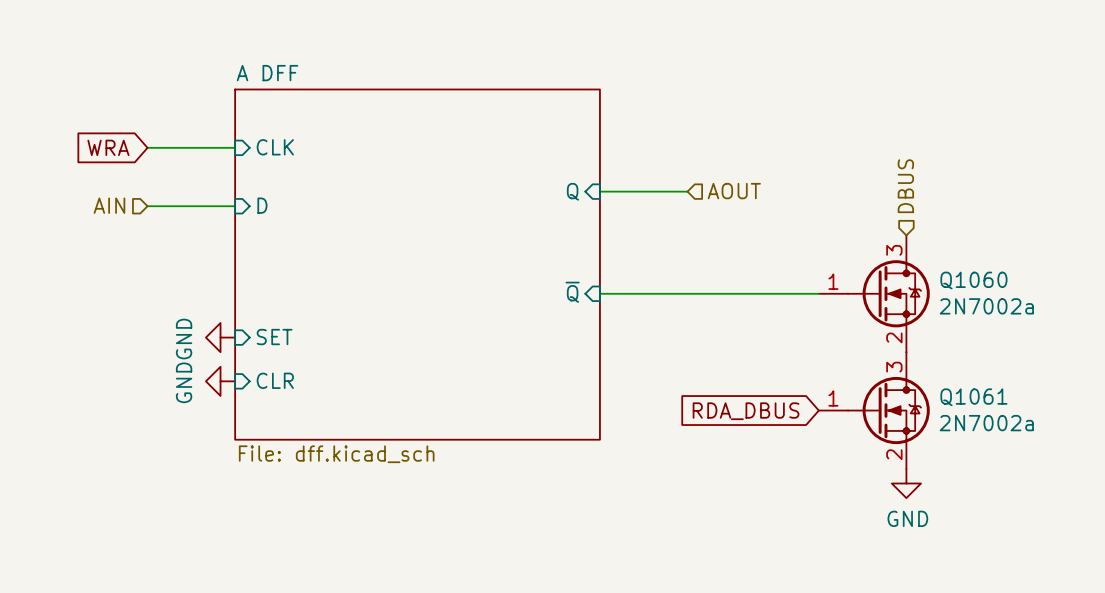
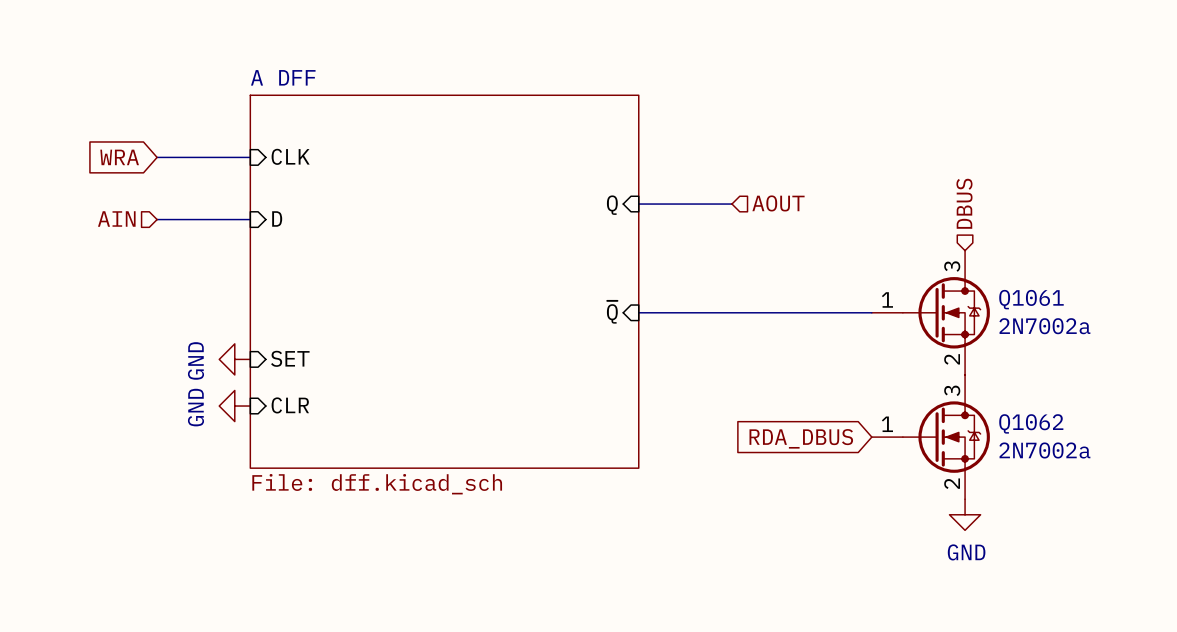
Q1060 name: Q1060 (973, 280) -> Q1061 (1031, 299)
Q1061 name: Q1061 (973, 397) -> Q1062 (1031, 423)

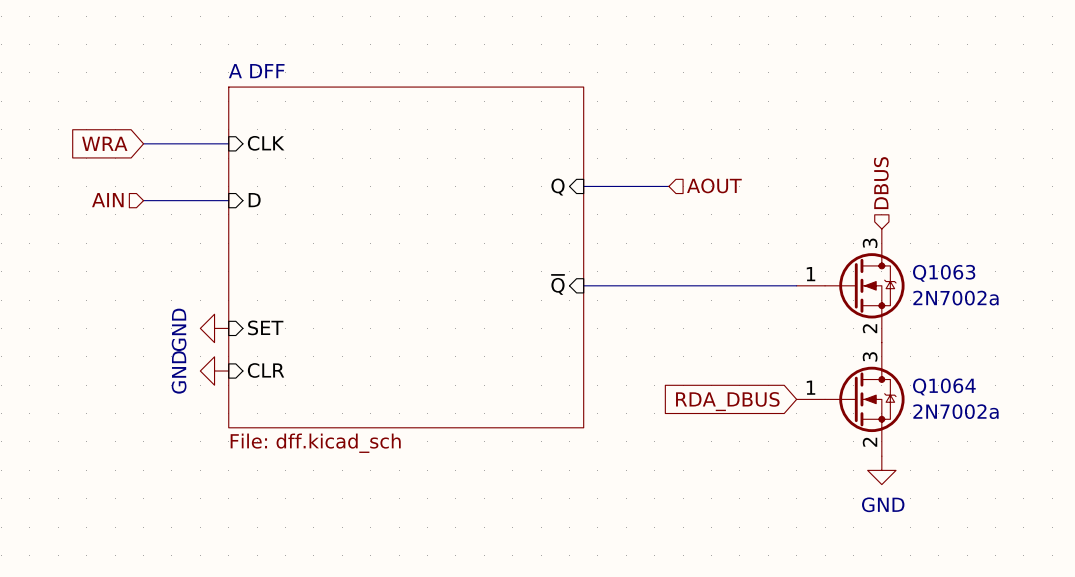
Q1061 name: Q1061 (1031, 299) -> Q1063 (944, 273)
Q1062 name: Q1062 (1031, 423) -> Q1064 (944, 386)

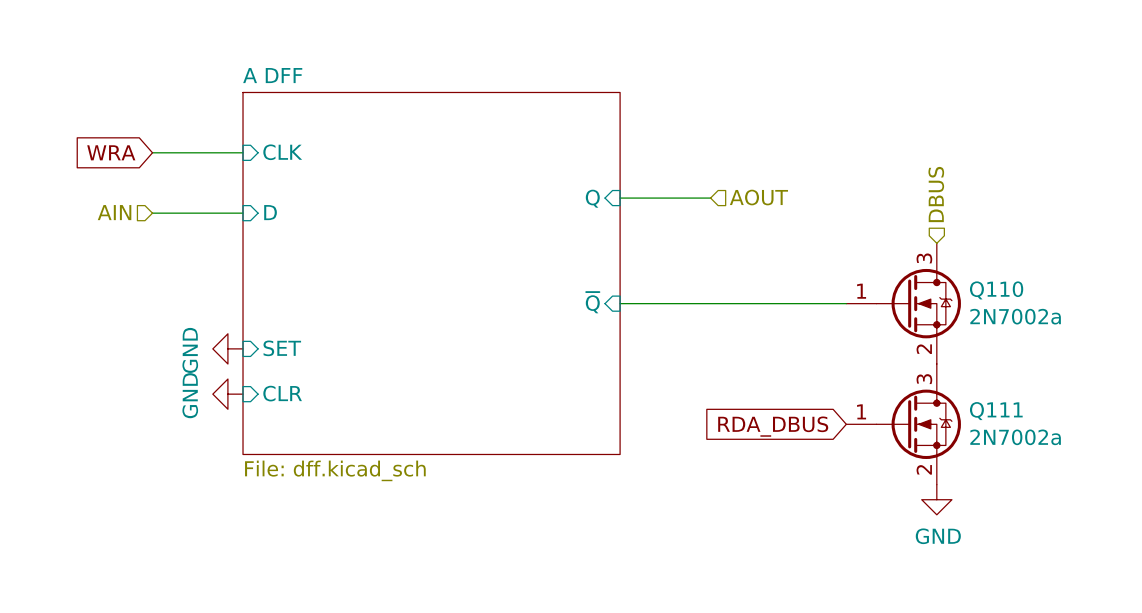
Q1063 name: Q1063 (944, 273) -> Q110 (996, 290)
Q1064 name: Q1064 (944, 386) -> Q111 (996, 411)

